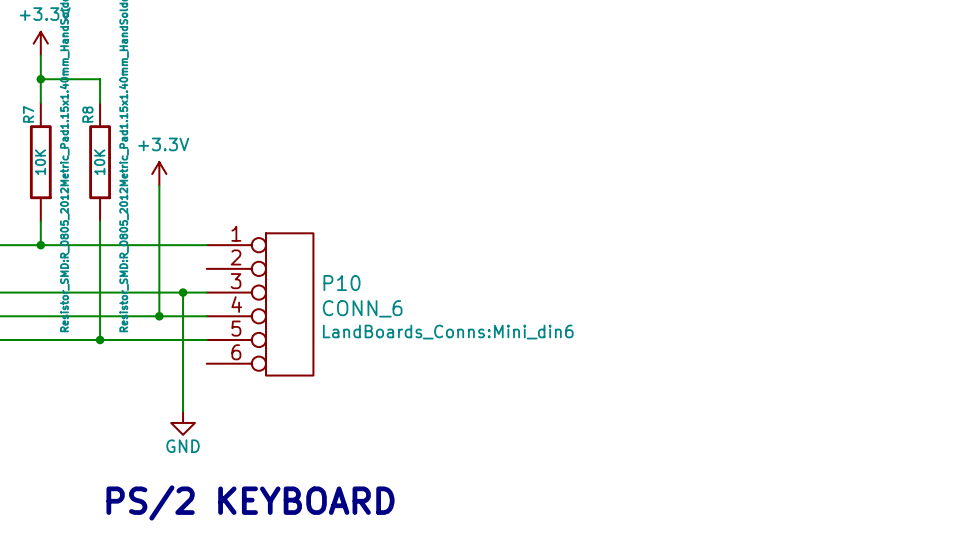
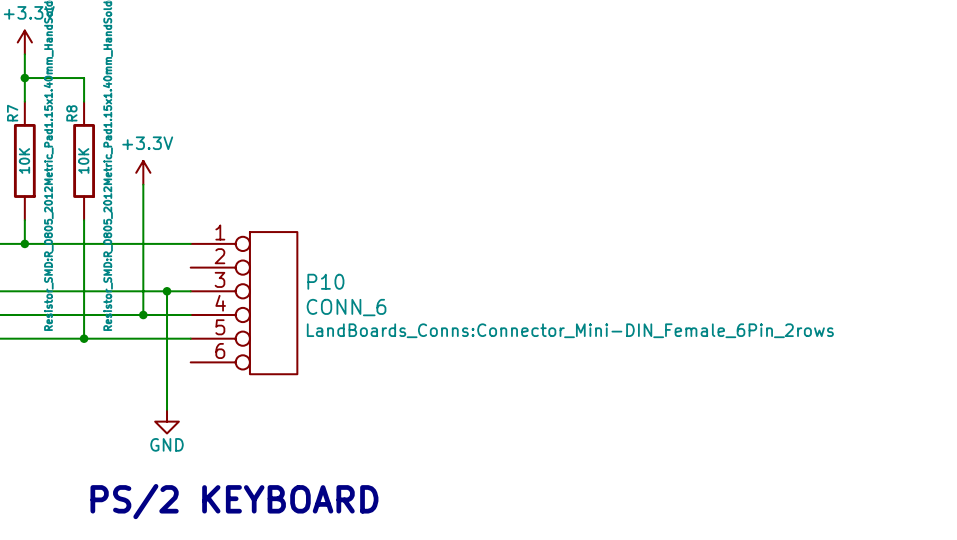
P10 text: LandBoards_Conns:Mini_din6 (448, 332) -> LandBoards_Conns:Connector_Mini-DIN_Female_6Pin_2rows (570, 330)

